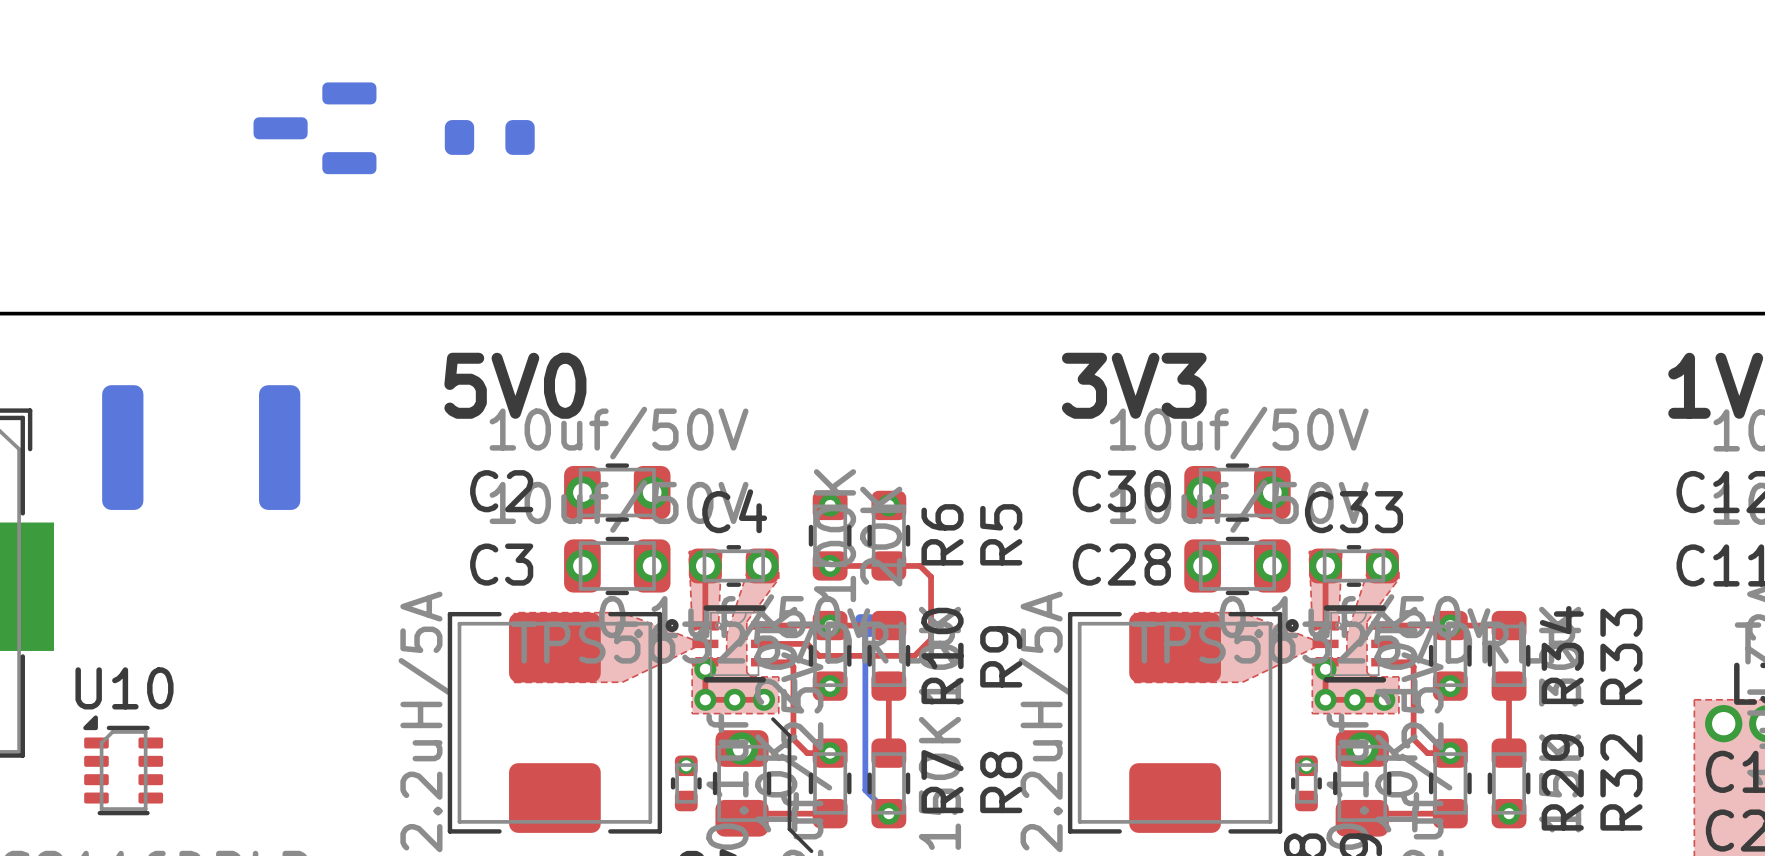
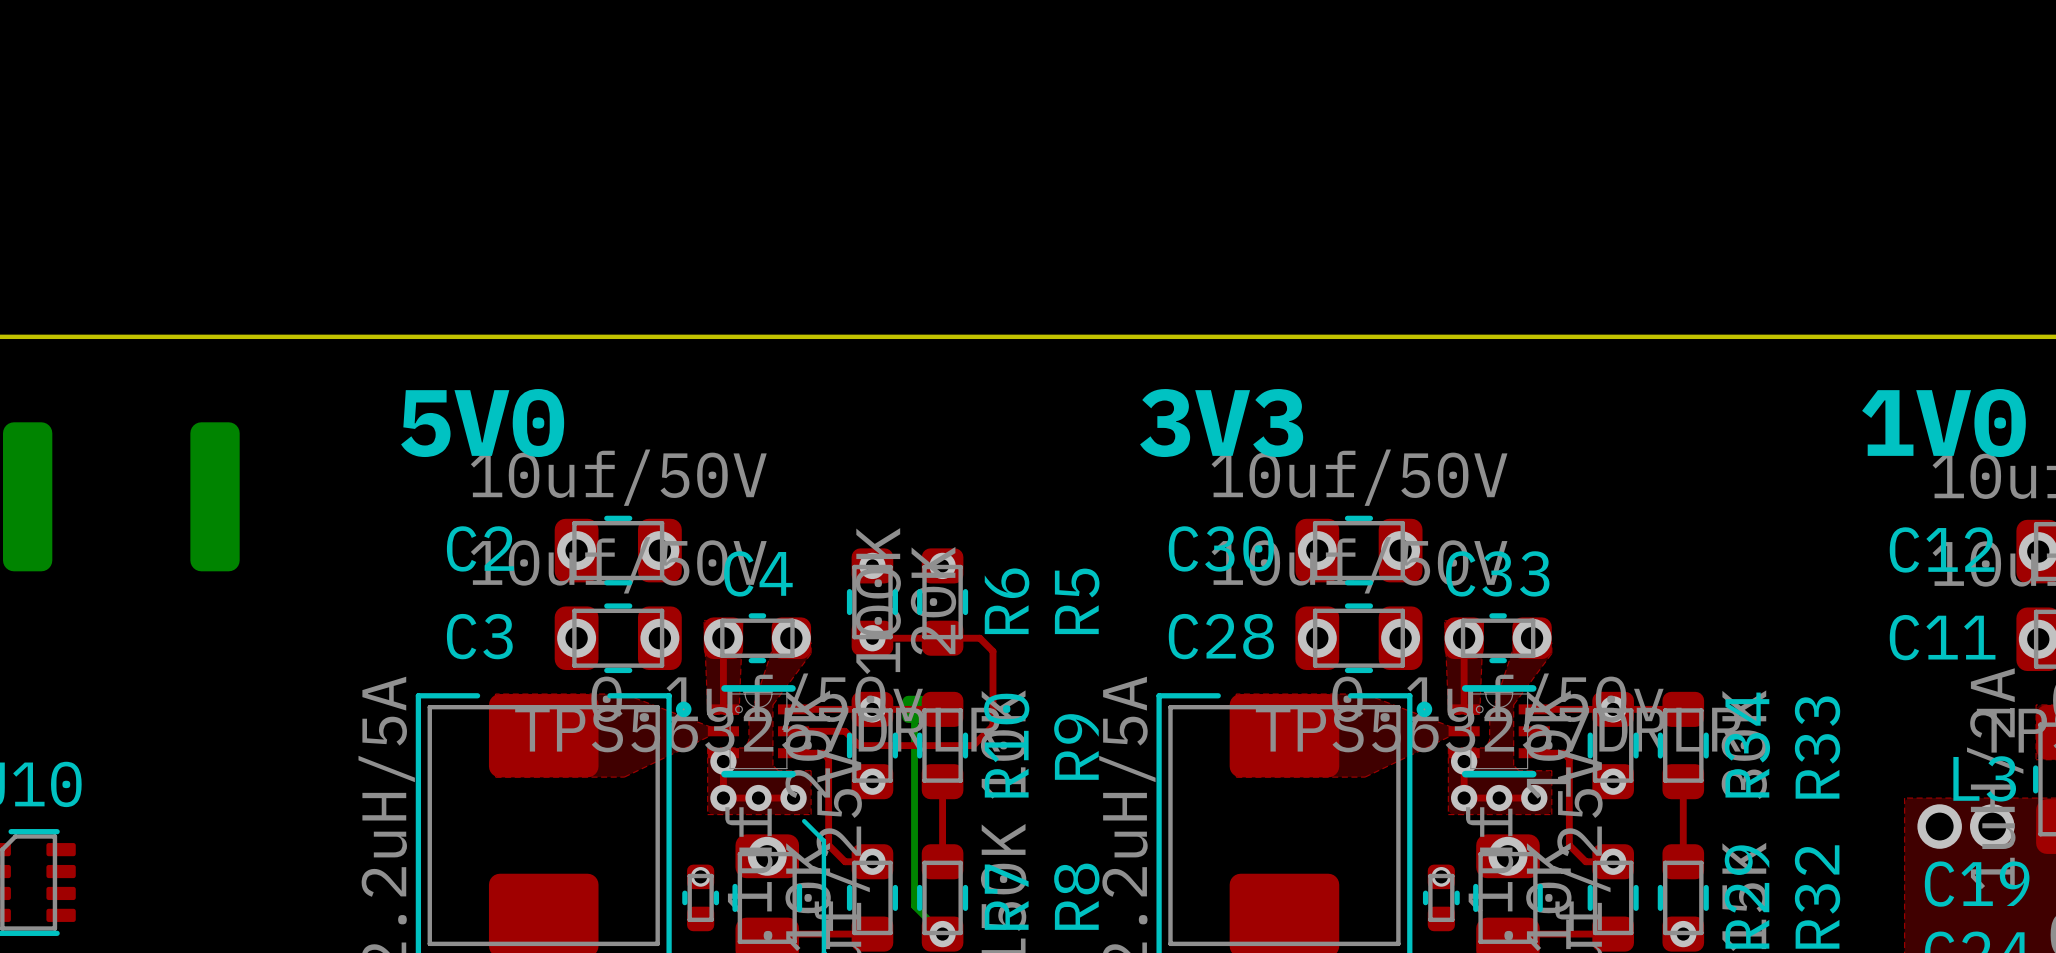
part: (314, 128) -> none
part: (489, 137) -> none

